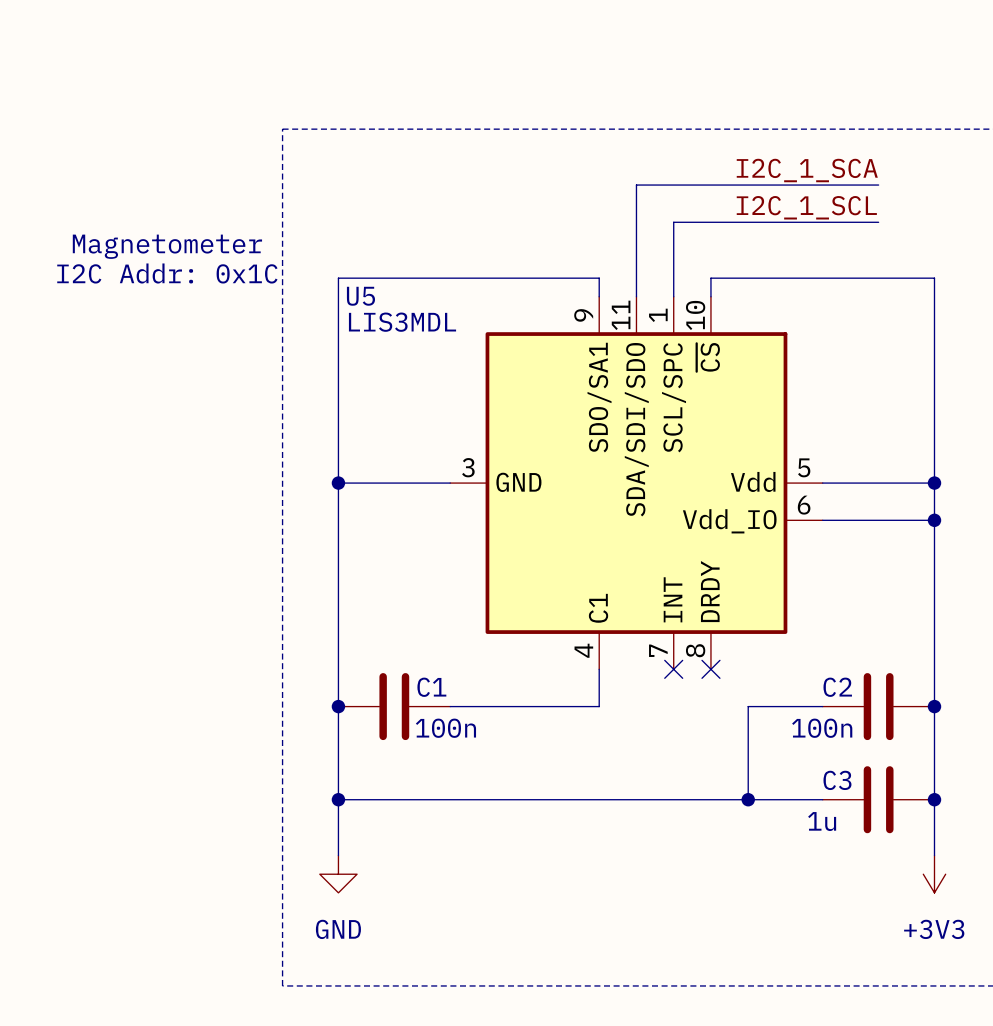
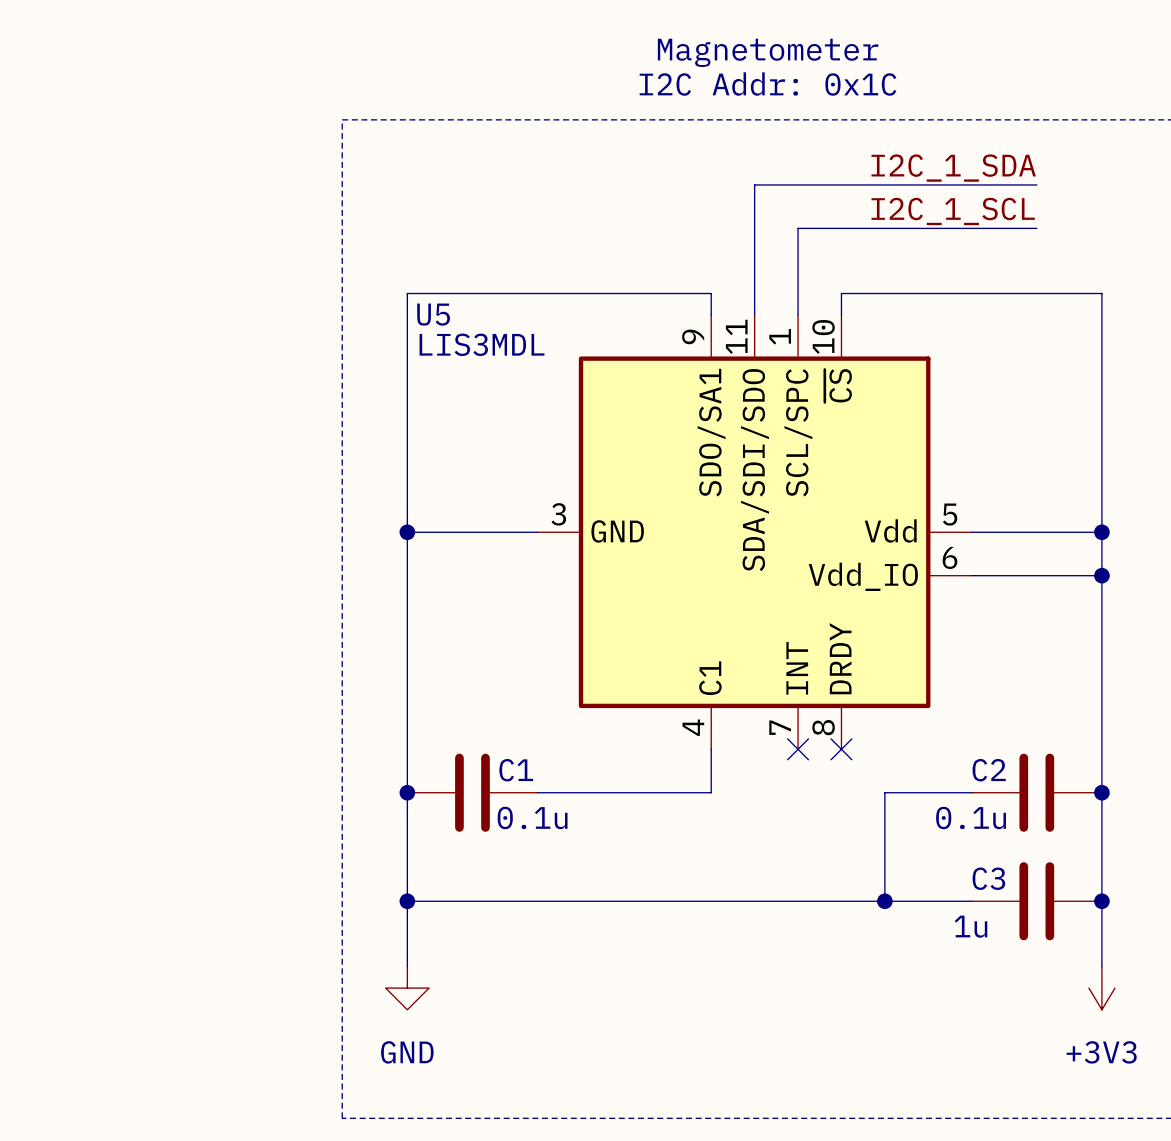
text: none -> Magnetometer (768, 52)
text: none -> I2C Addr: 0x1C (768, 84)
label: I2C_1_SCA (807, 170) -> I2C_1_SDA (953, 168)
text: Magnetometer (167, 246) -> none
text: I2C Addr: 0x1C (167, 273) -> none
C1 value: 100n (445, 728) -> 0.1u (532, 817)
C2 value: 100n (822, 728) -> 0.1u (971, 817)

